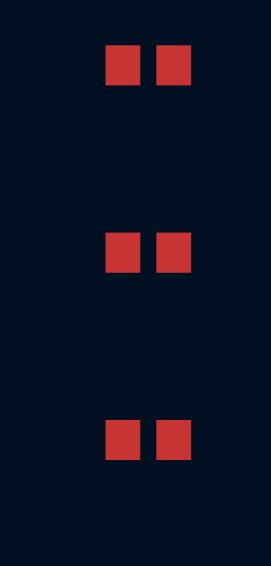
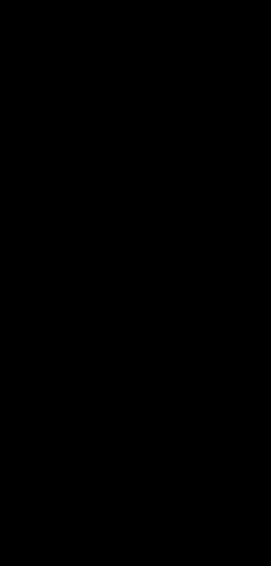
part: (148, 65) -> none
part: (148, 252) -> none
part: (148, 440) -> none

